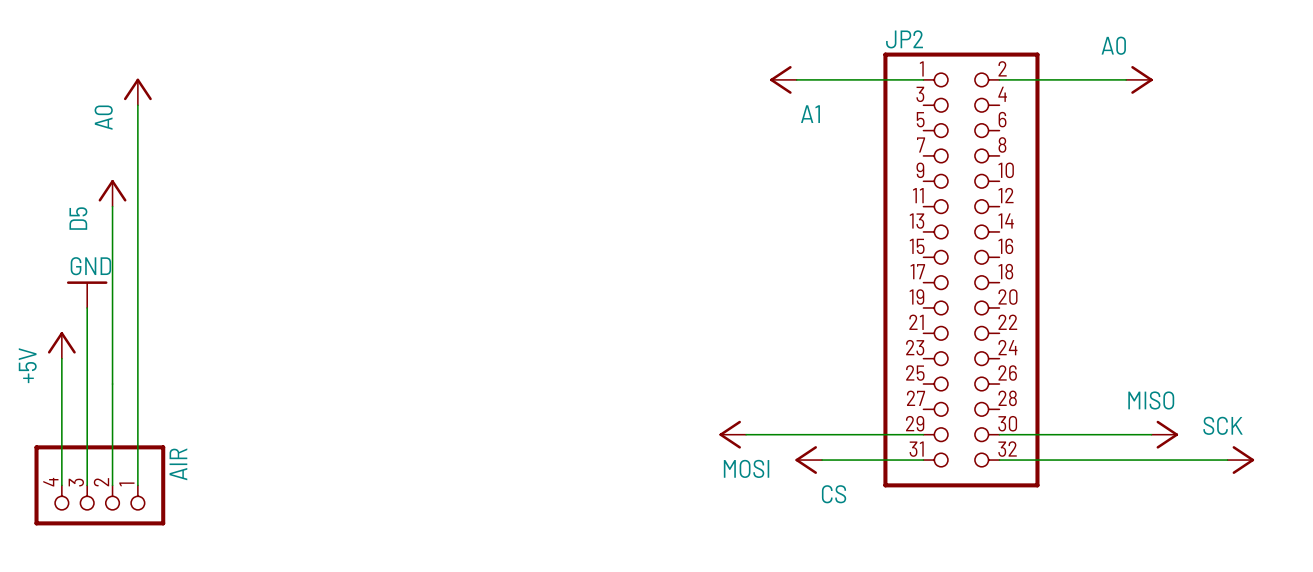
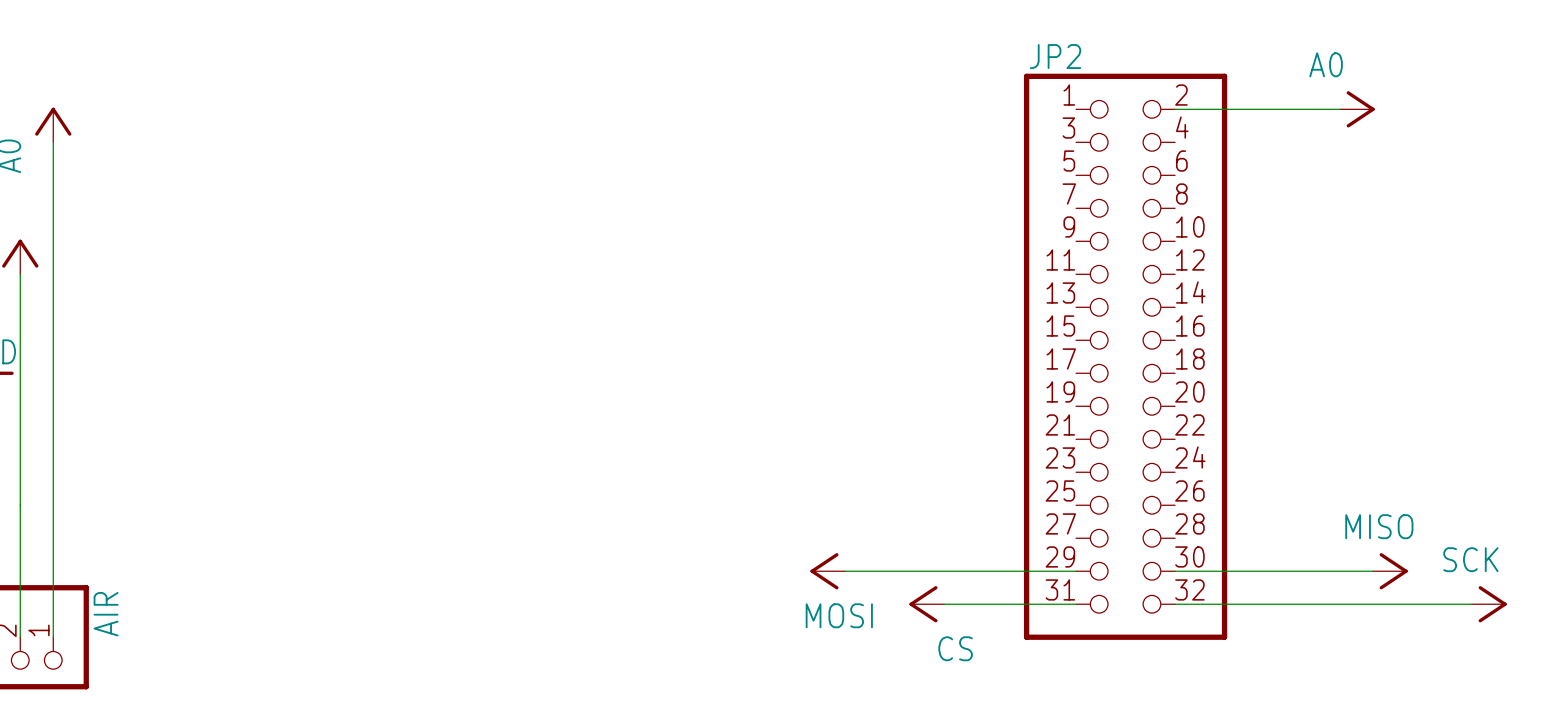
power symbol: A1 (783, 79) -> none
wire: (796, 79) (923, 79) -> none

